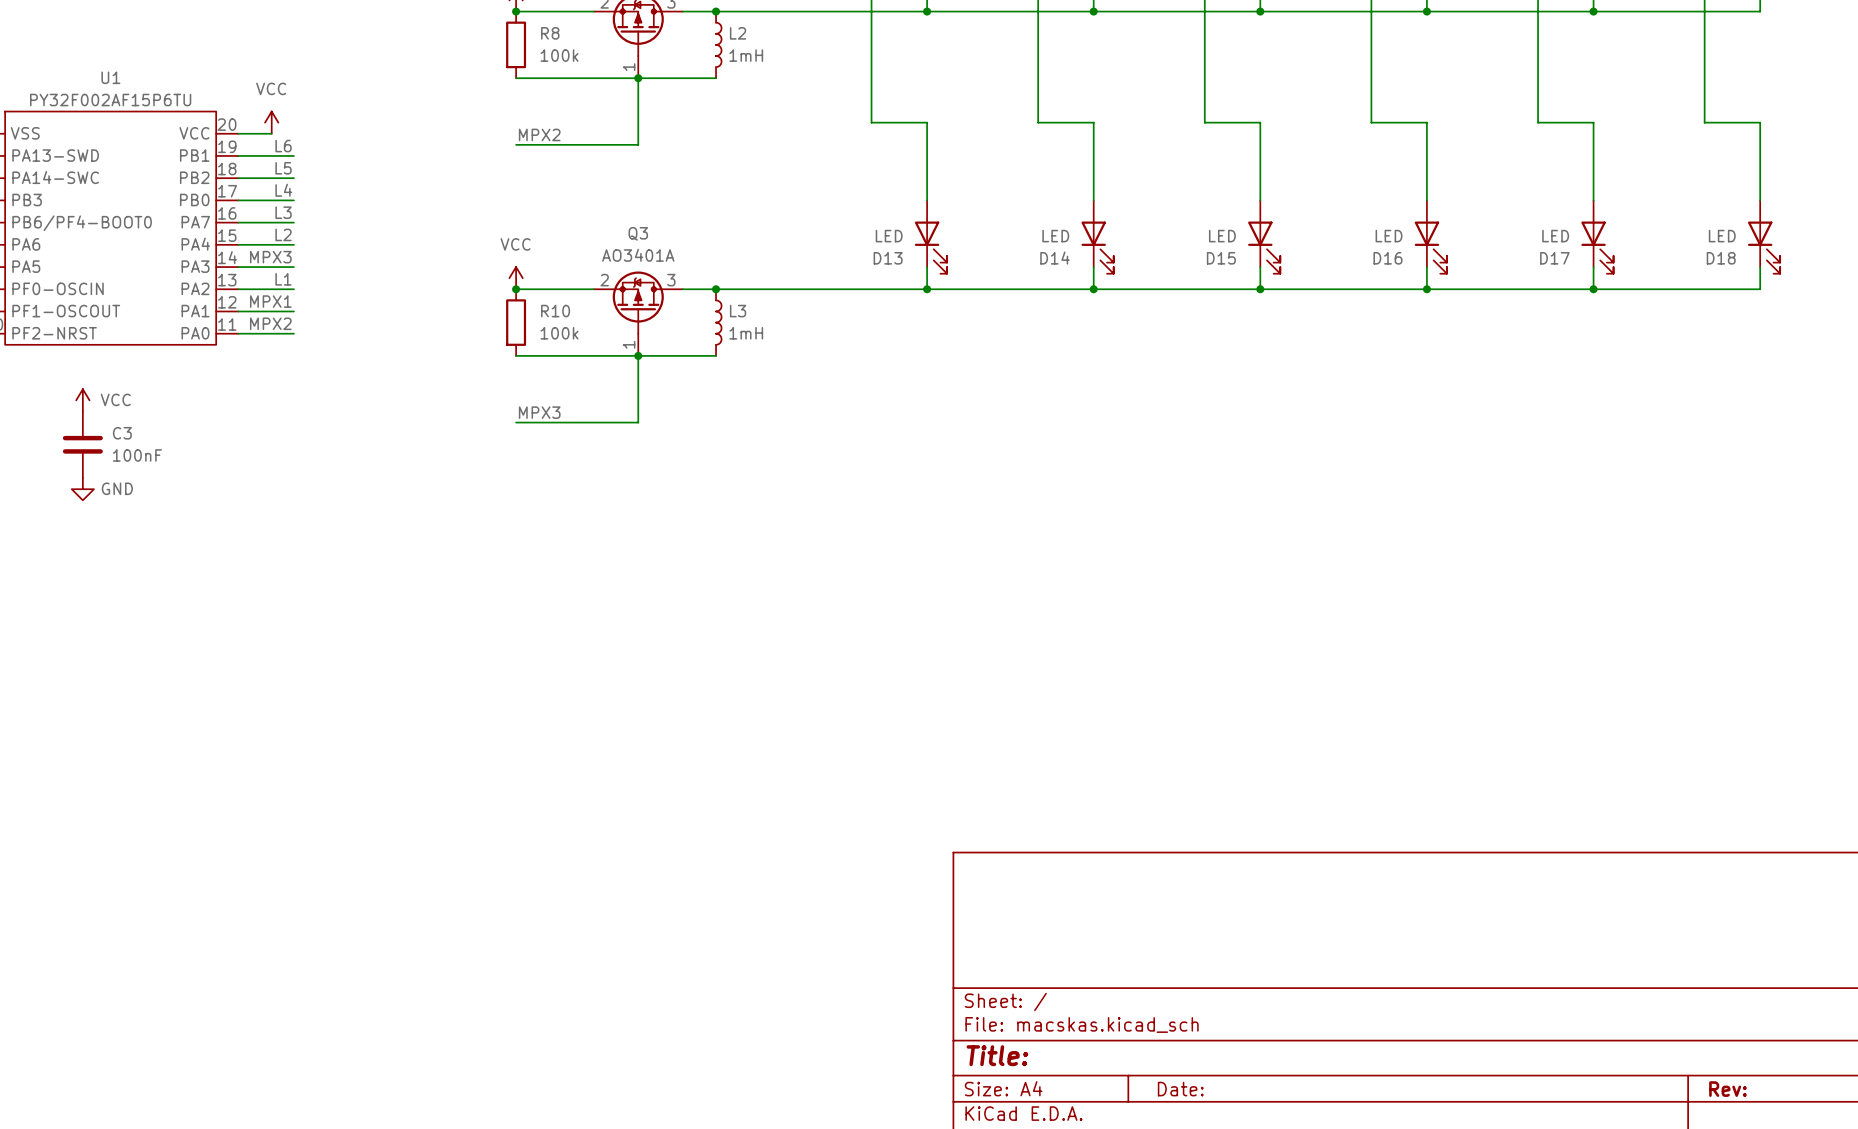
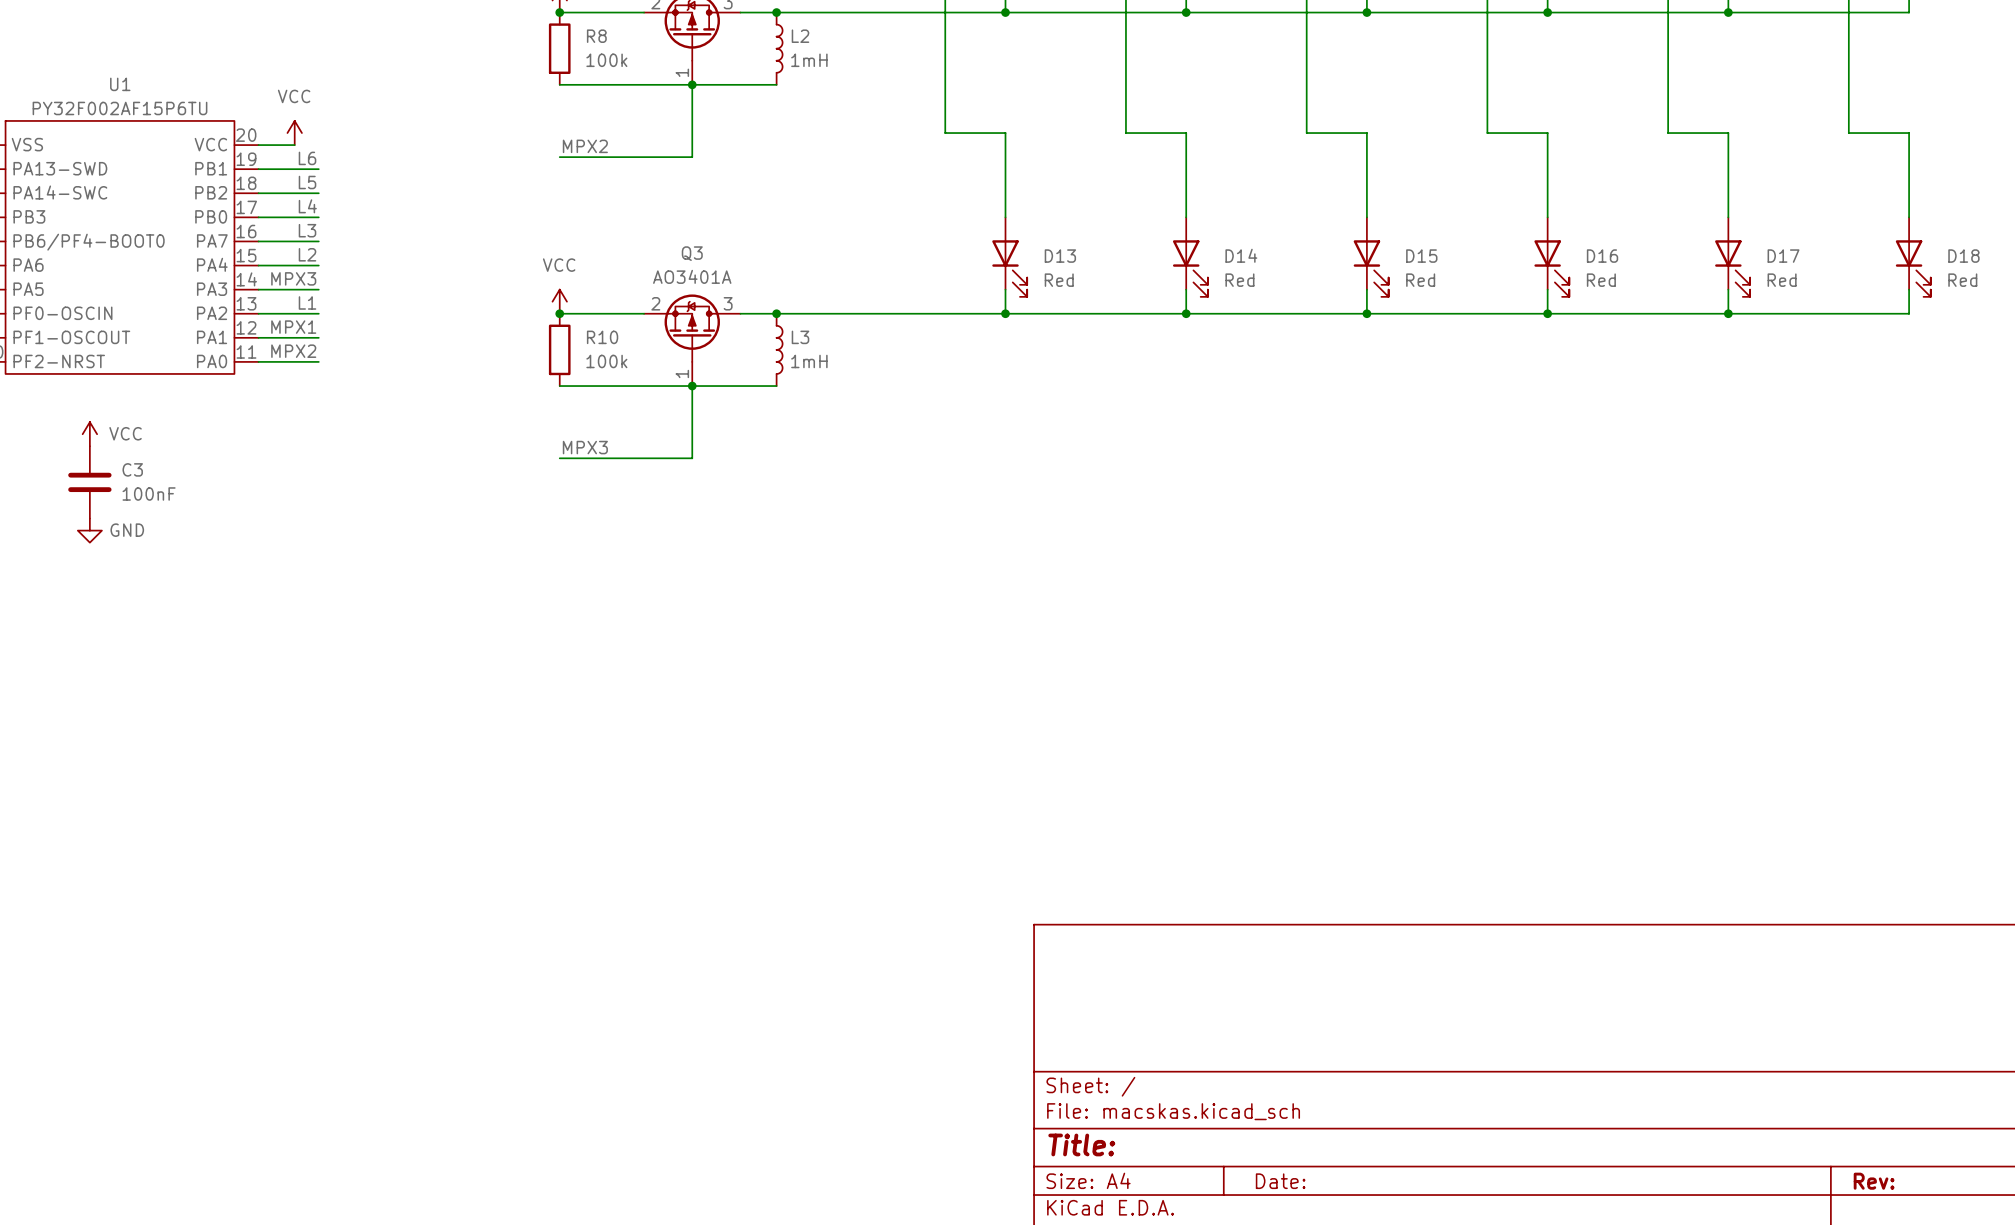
D13 value: LED (889, 236) -> Red (1059, 280)
D14 value: LED (1055, 236) -> Red (1239, 280)
D15 value: LED (1222, 236) -> Red (1420, 280)
D16 value: LED (1389, 236) -> Red (1601, 280)
D17 value: LED (1555, 236) -> Red (1782, 280)
D18 value: LED (1722, 236) -> Red (1962, 280)
D13 name position: D13 (888, 258) -> D13 (1060, 256)
D14 name position: D14 (1055, 258) -> D14 (1241, 255)
D15 name position: D15 (1221, 258) -> D15 (1421, 256)
D16 name position: D16 (1387, 258) -> D16 (1602, 256)
D17 name position: D17 (1554, 258) -> D17 (1783, 256)
D18 name position: D18 (1721, 258) -> D18 (1963, 256)

